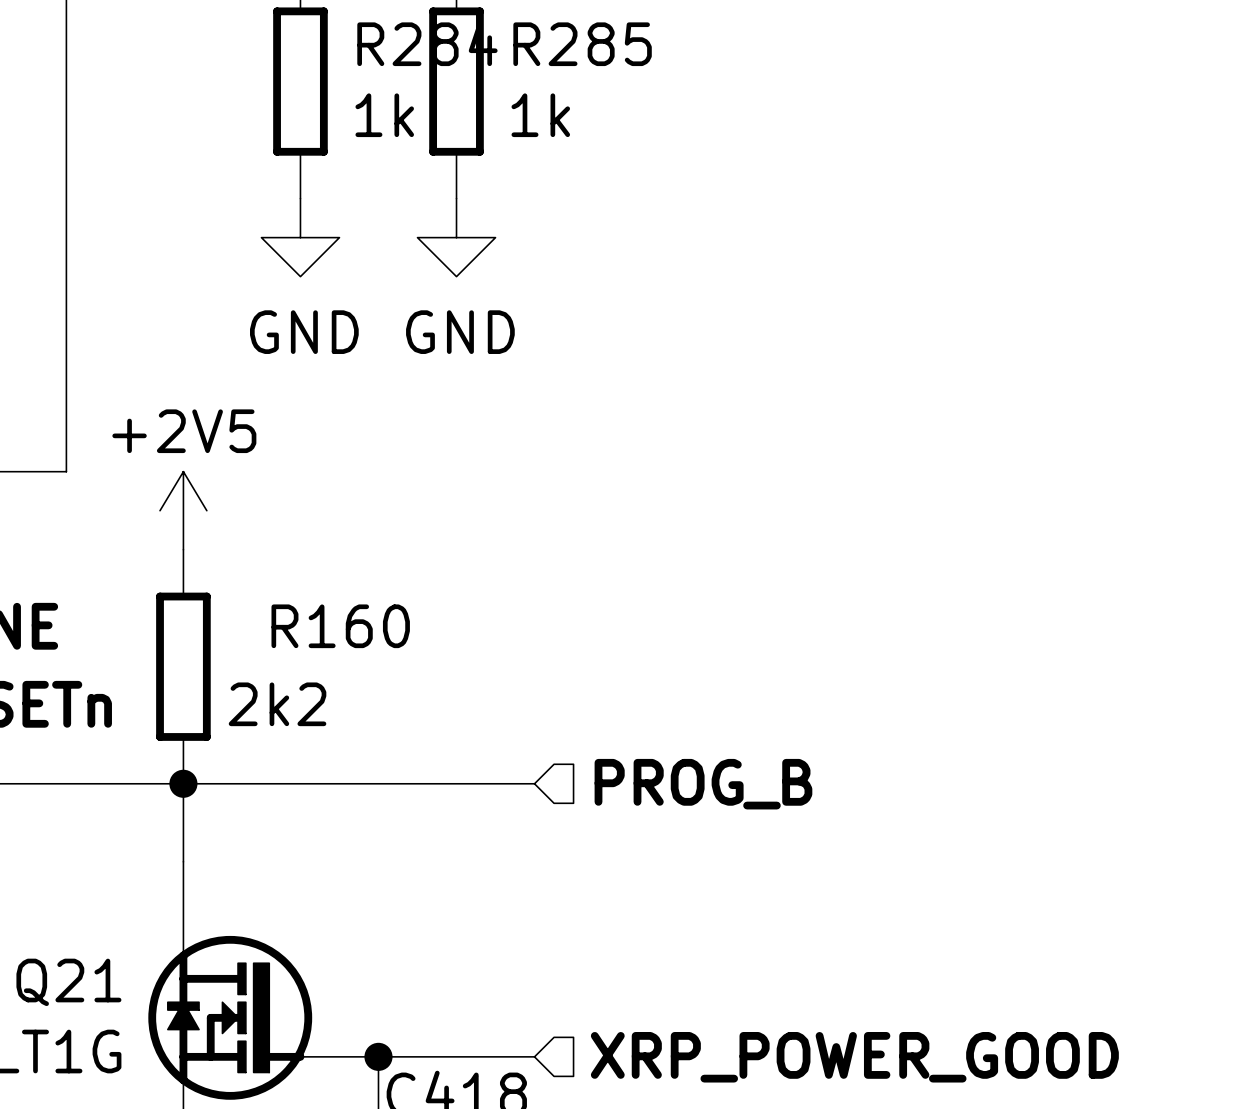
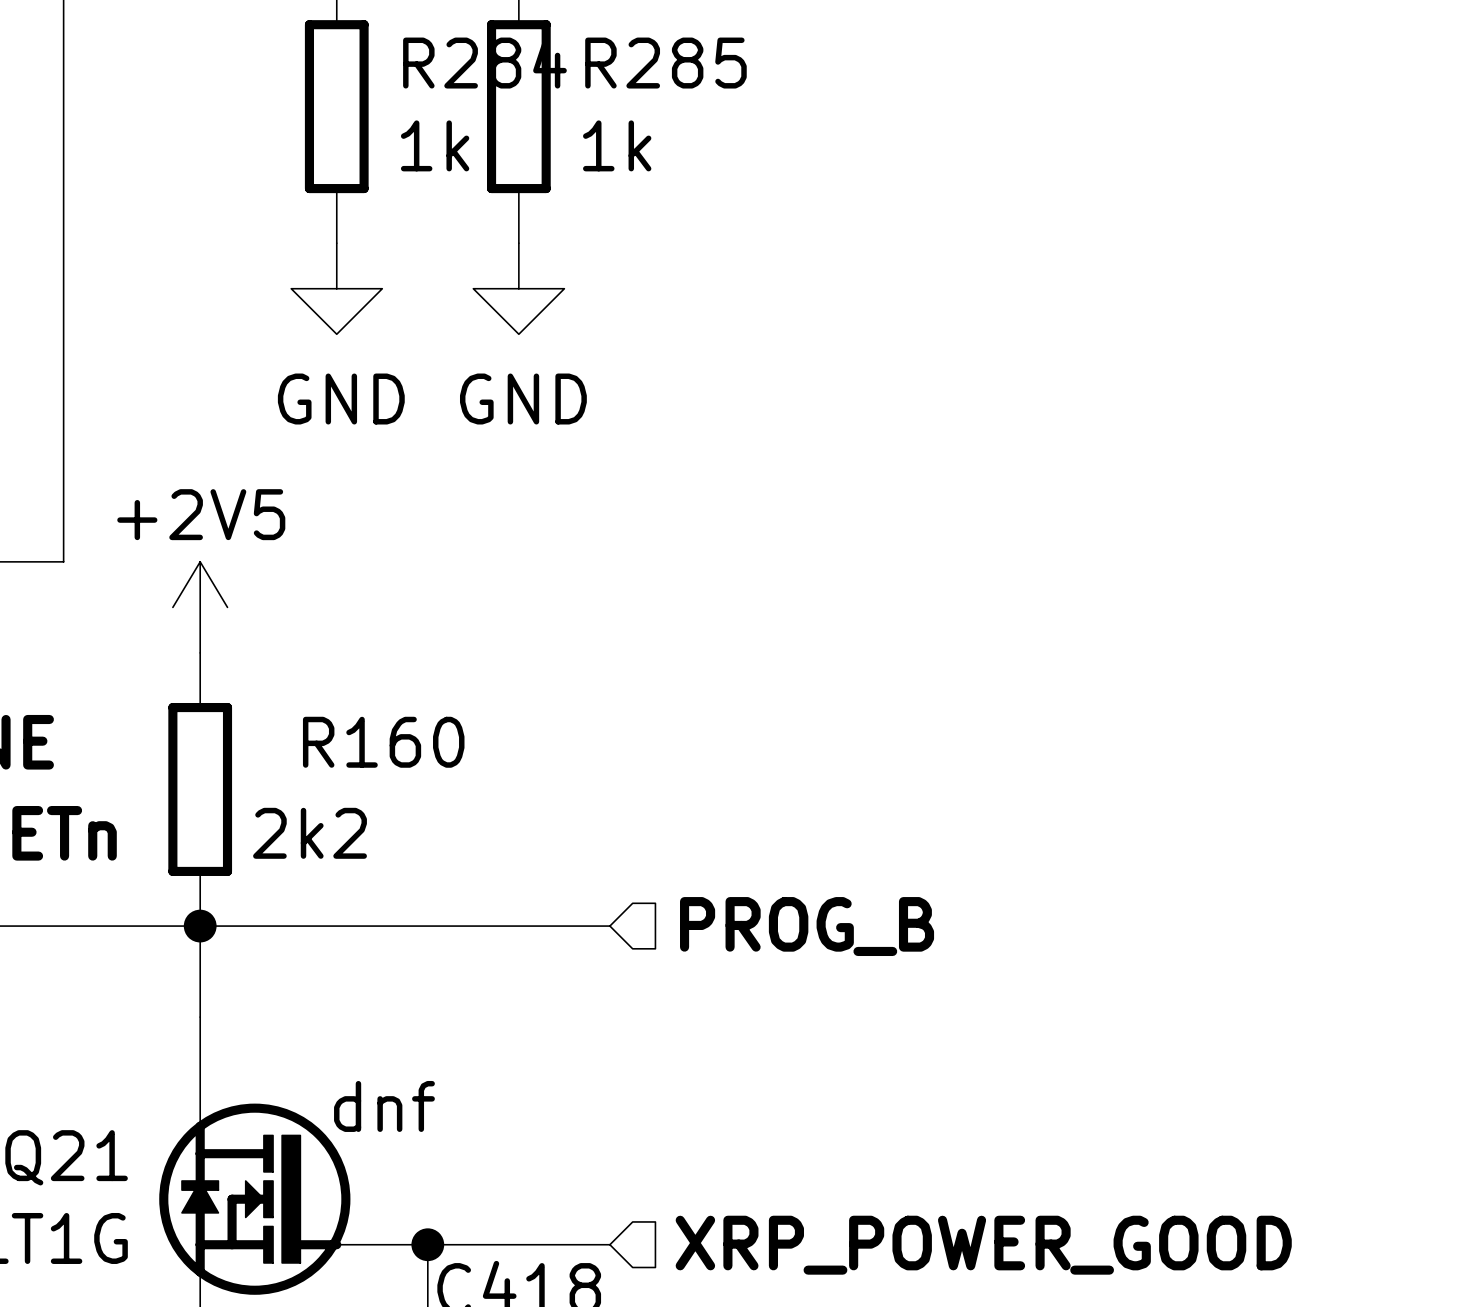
Q21 text: none -> dnf (384, 1106)

